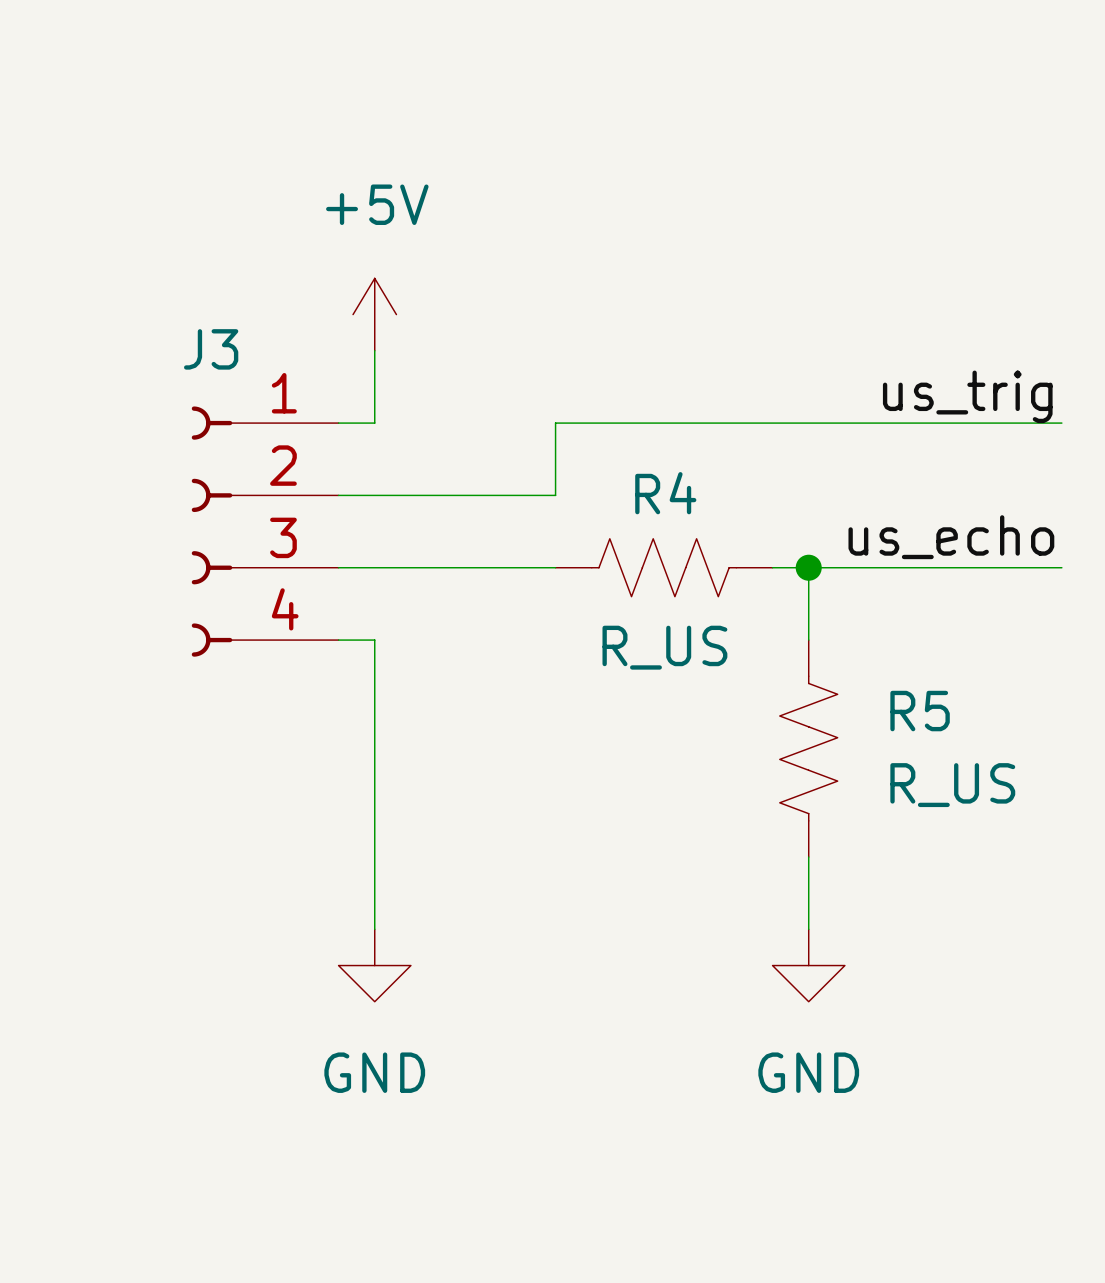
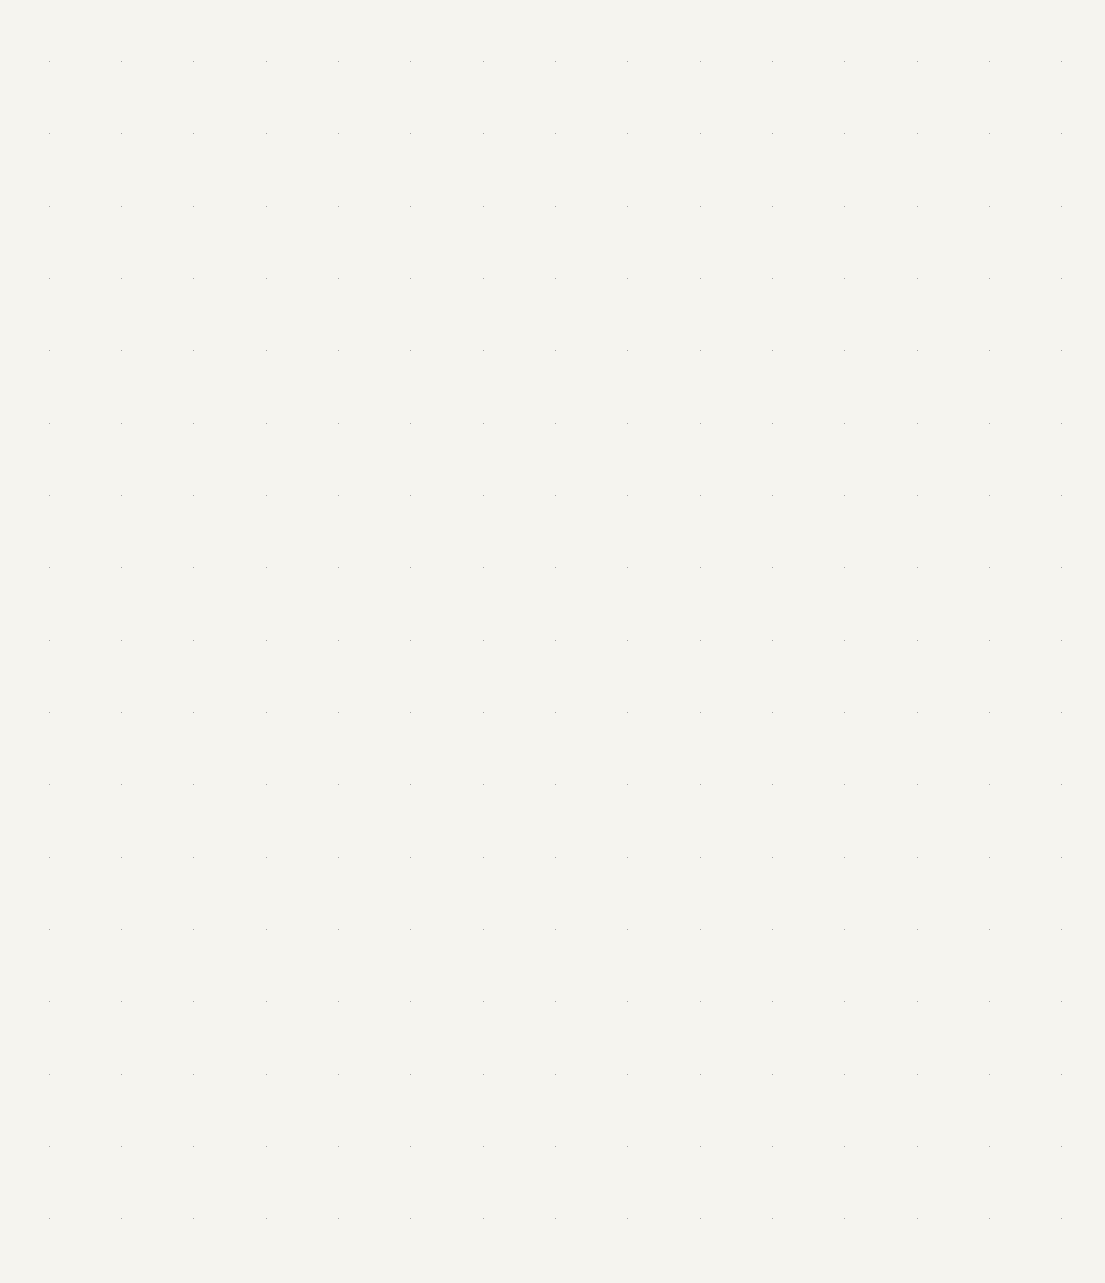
power symbol: +5V (374, 314) -> none
wire: (374, 350) (374, 423) (338, 423) -> none
label: us_trig (967, 396) -> none
wire: (1061, 423) (555, 423) (555, 495) (338, 495) -> none
J3: (265, 531) -> none
label: us_echo (951, 537) -> none
wire: (338, 567) (555, 567) -> none
R4: R_US (664, 567) -> none
wire: (772, 567) (1061, 567) -> none
wire: (808, 567) (808, 640) -> none
junction: (808, 567) -> none
wire: (338, 640) (374, 640) (374, 929) -> none
R5: R_US (808, 748) -> none
wire: (808, 857) (808, 929) -> none
power symbol: GND (374, 965) -> none
power symbol: GND (808, 965) -> none

